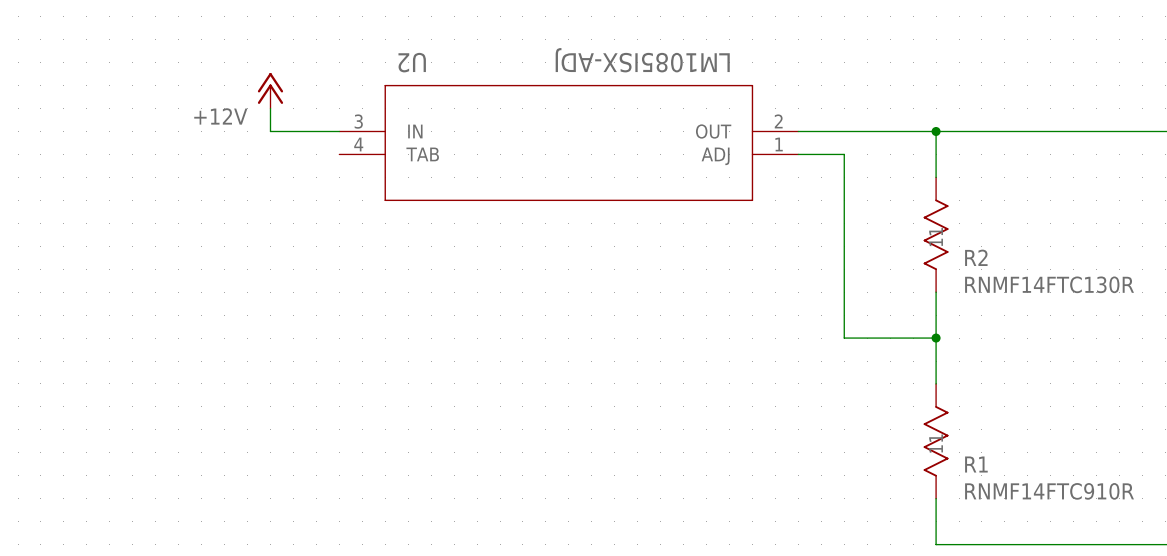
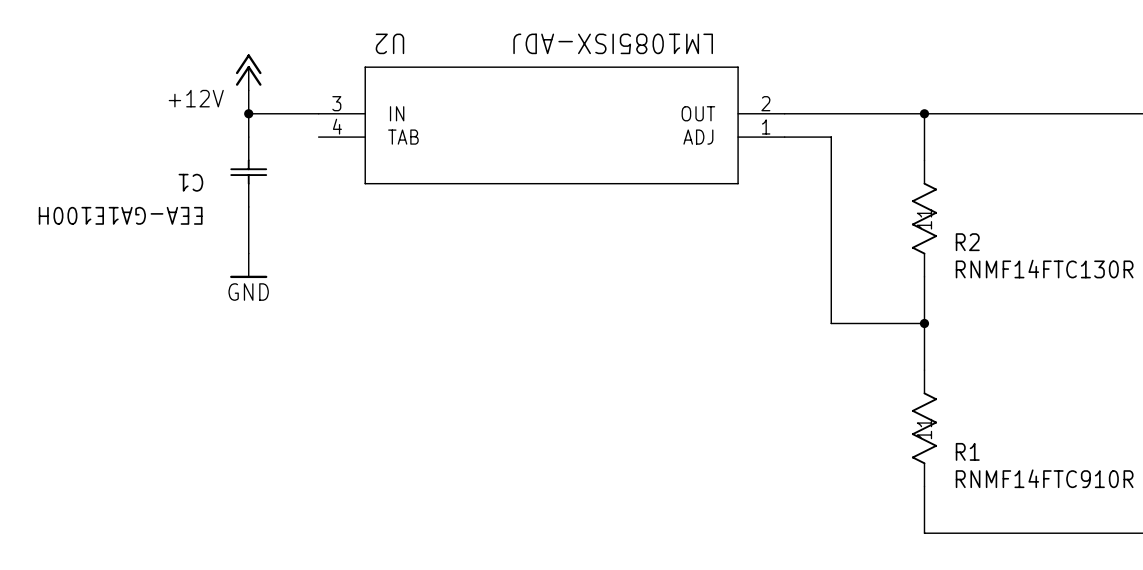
wire: none -> (248, 113) (248, 137)
junction: none -> (248, 113)
C1: none -> EEA-GA1E100H (248, 172)
wire: none -> (248, 206) (248, 253)
power symbol: none -> GND (248, 265)

